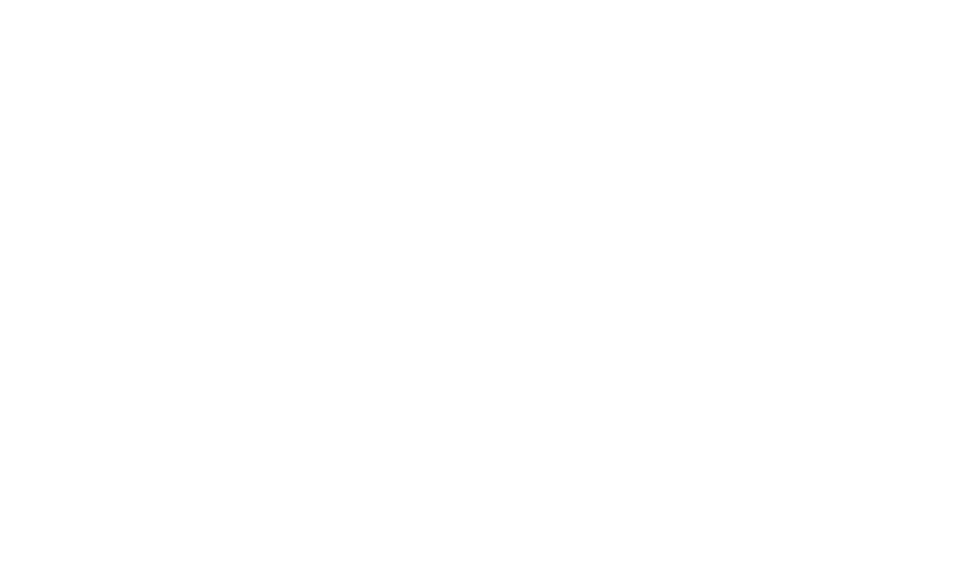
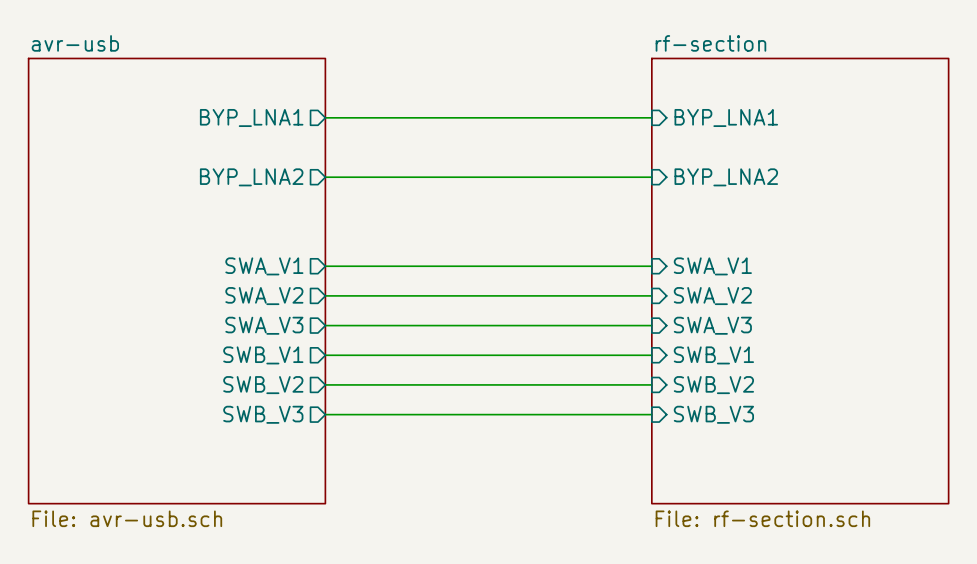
sheet pin: none -> BYP_LNA1 (251, 117)
wire: none -> (325, 117) (651, 117)
sheet pin: none -> BYP_LNA1 (726, 117)
sheet pin: none -> BYP_LNA2 (251, 177)
wire: none -> (325, 177) (651, 177)
sheet pin: none -> BYP_LNA2 (726, 177)
sheet pin: none -> SWA_V1 (264, 266)
wire: none -> (325, 266) (651, 266)
sheet pin: none -> SWA_V1 (712, 266)
sheet avr-usb: none -> File: avr-usb.sch (176, 281)
sheet rf-section: none -> File: rf-section.sch (800, 281)
wire: none -> (325, 295) (651, 295)
sheet pin: none -> SWA_V2 (264, 296)
sheet pin: none -> SWA_V2 (712, 296)
sheet pin: none -> SWA_V3 (264, 325)
wire: none -> (325, 325) (651, 325)
sheet pin: none -> SWA_V3 (712, 325)
sheet pin: none -> SWB_V1 (263, 355)
wire: none -> (325, 355) (651, 355)
sheet pin: none -> SWB_V1 (713, 355)
wire: none -> (325, 384) (651, 384)
sheet pin: none -> SWB_V2 (263, 385)
sheet pin: none -> SWB_V2 (713, 385)
sheet pin: none -> SWB_V3 (263, 414)
wire: none -> (325, 414) (651, 414)
sheet pin: none -> SWB_V3 (713, 414)

